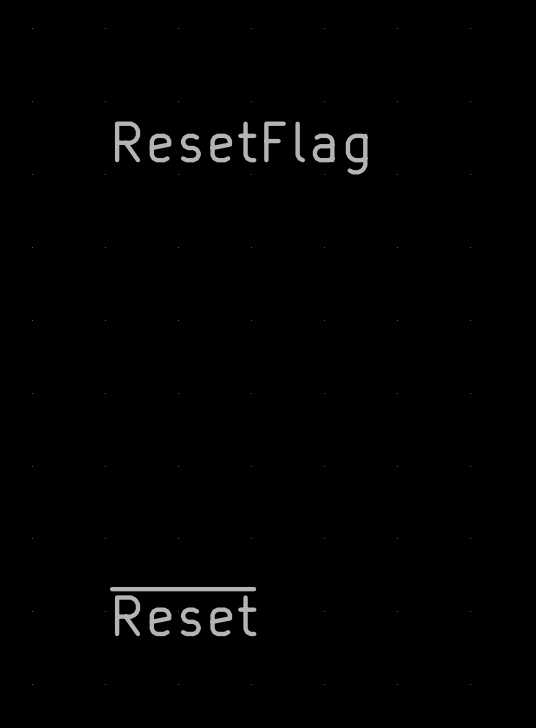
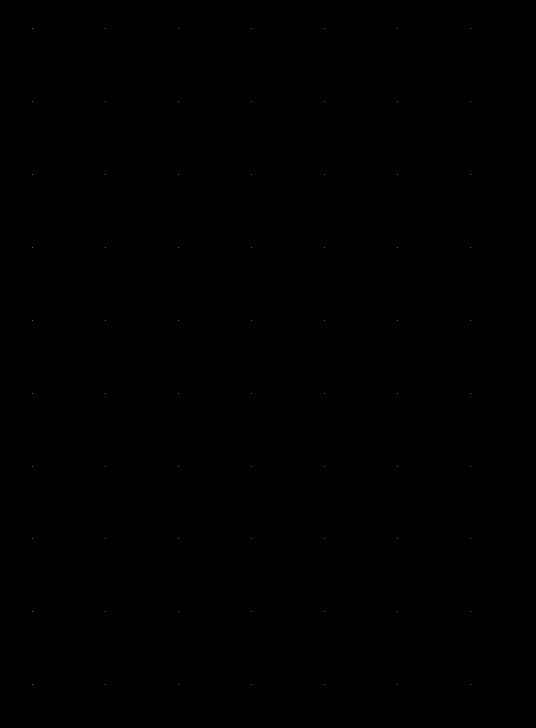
label: ResetFlag (241, 148) -> none
label: ~{Reset} (183, 611) -> none

